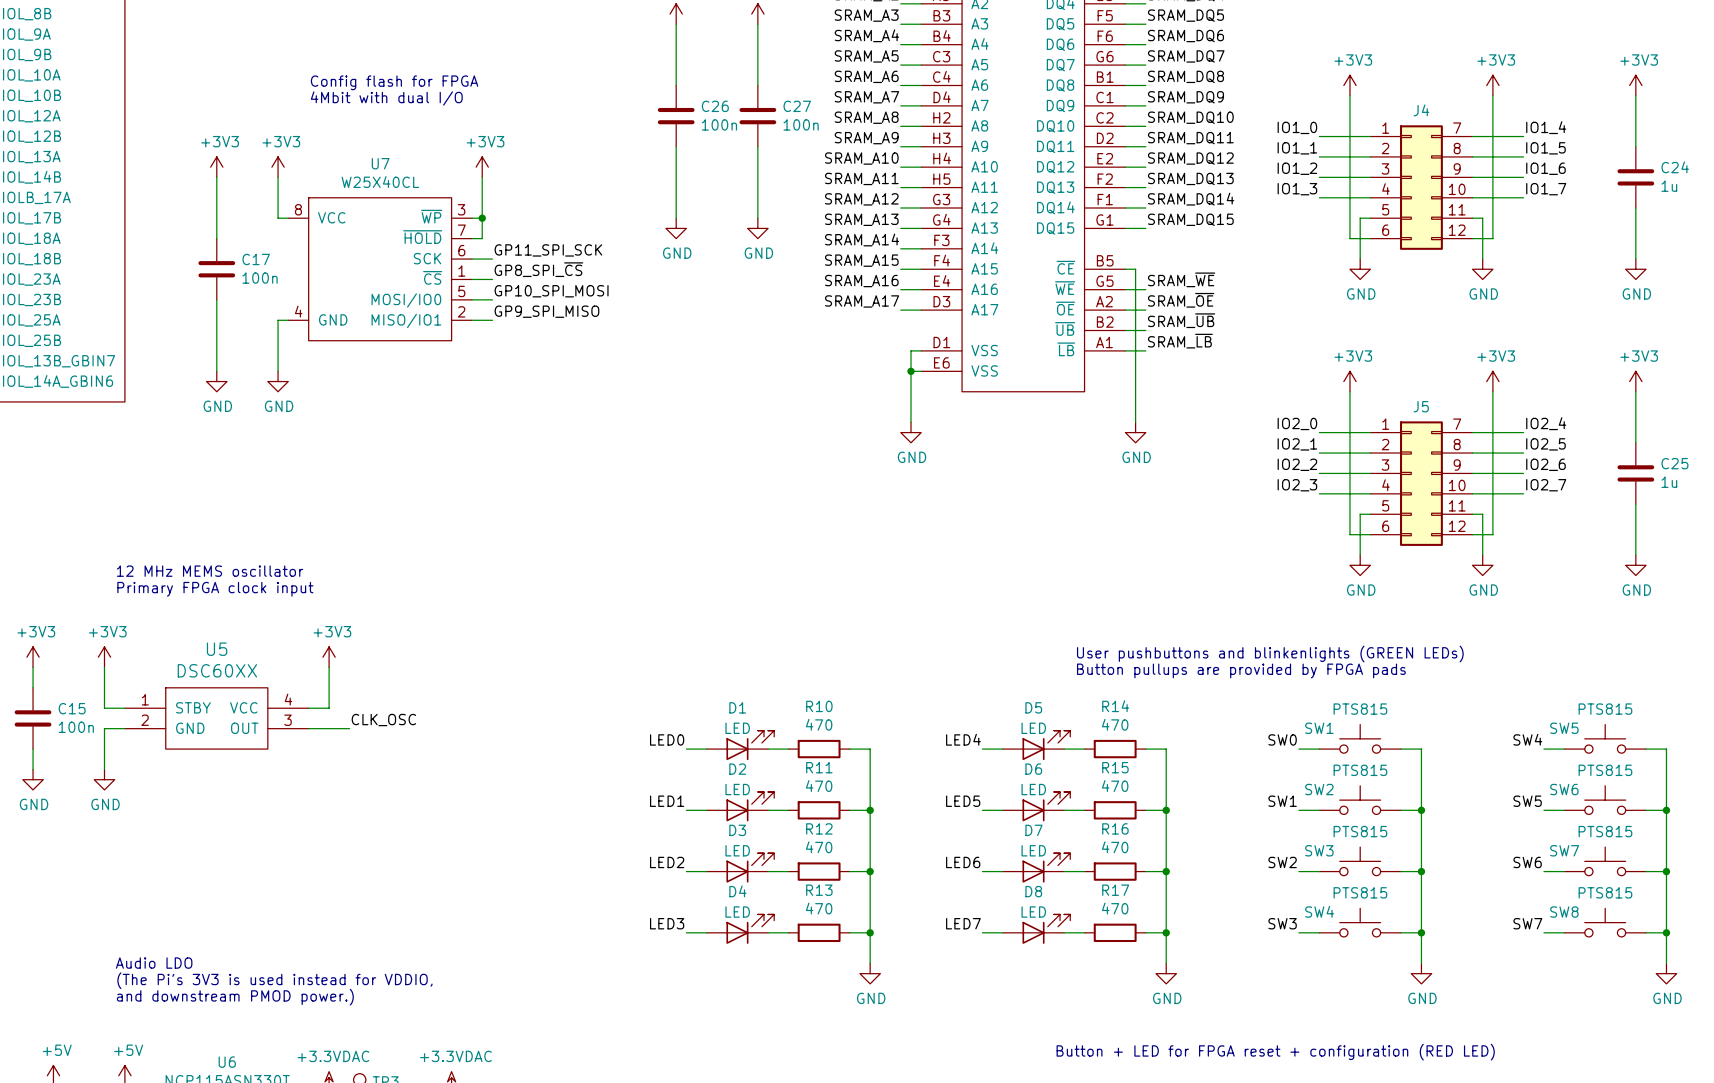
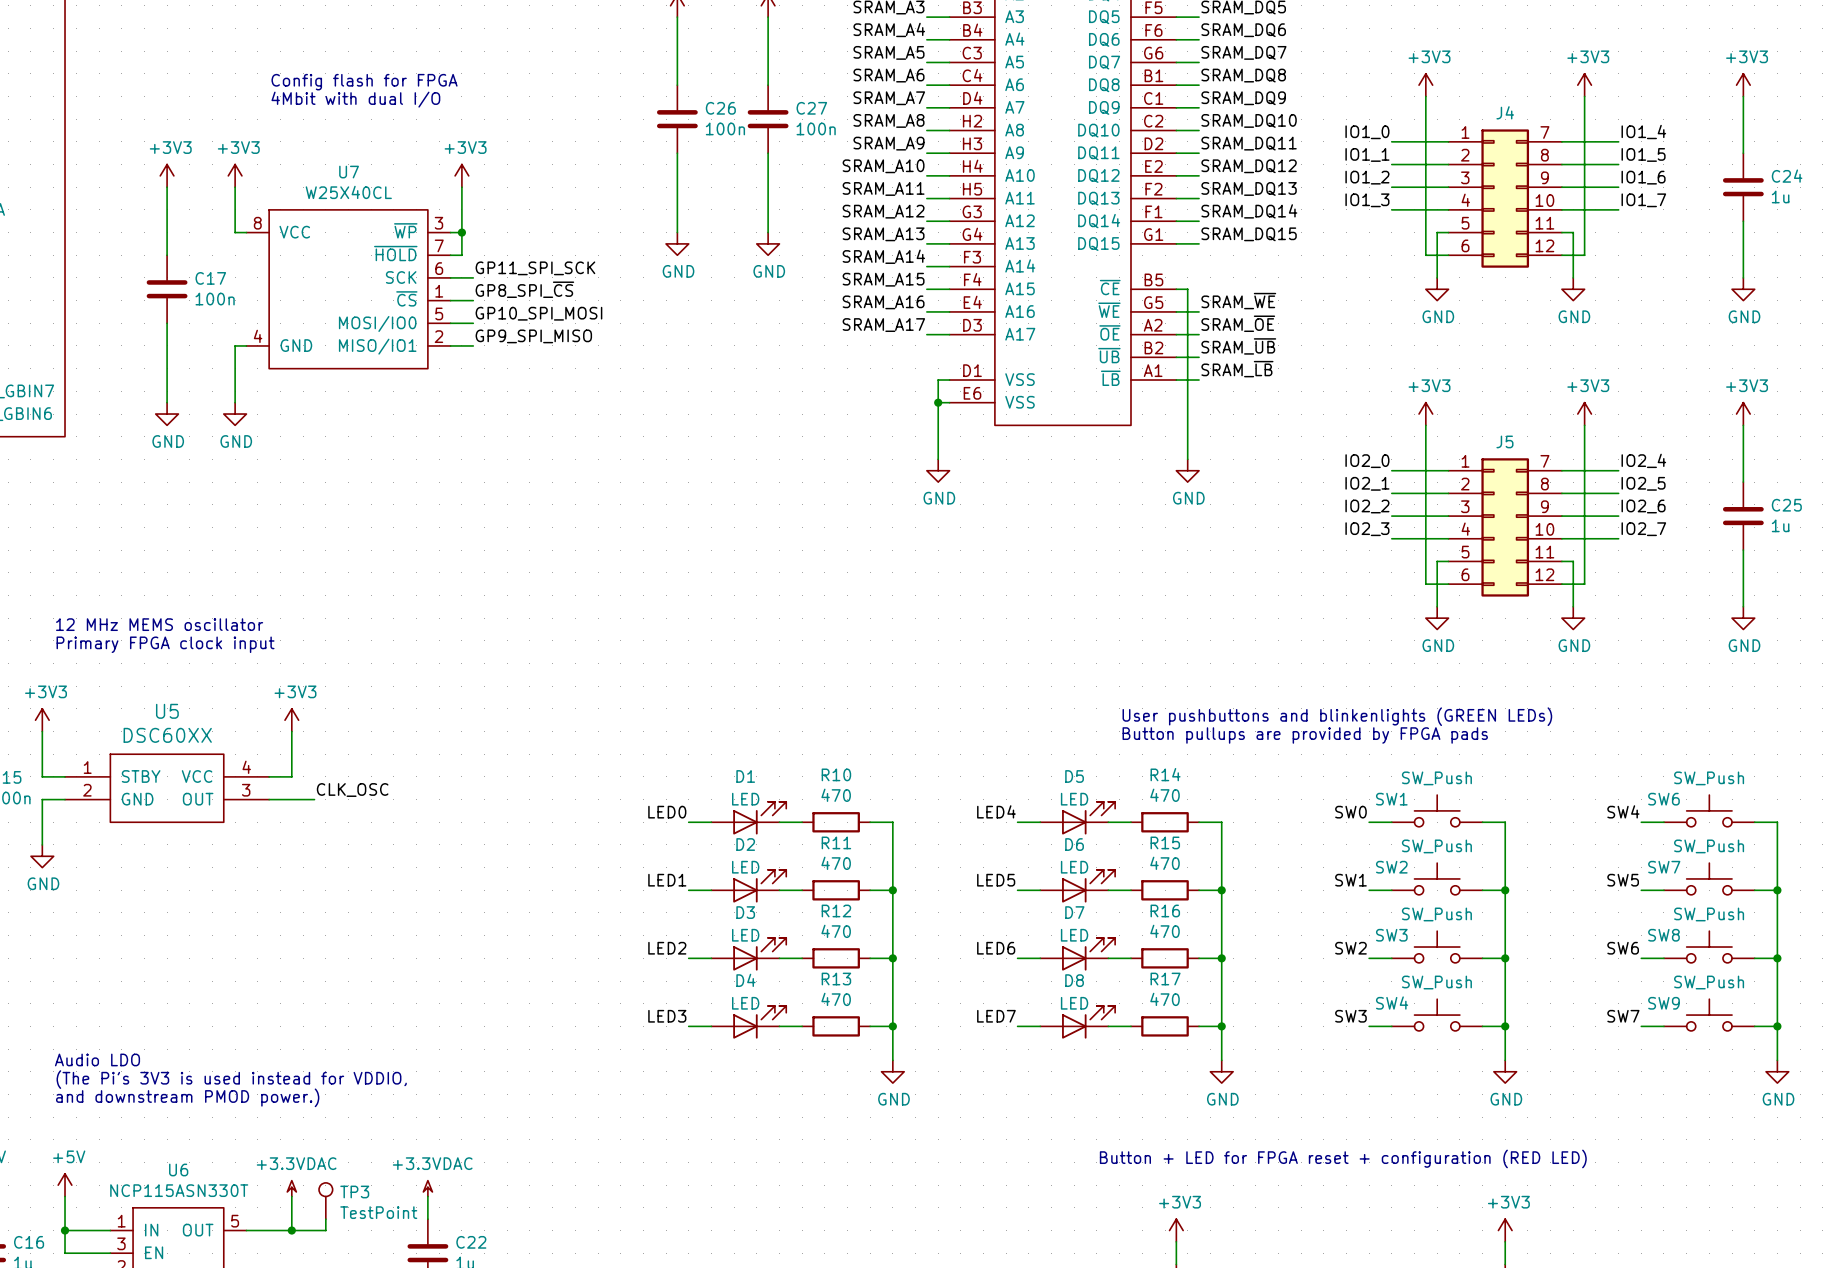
SW1 value: PTS815 (1360, 709) -> SW_Push (1436, 778)
SW5 value: PTS815 (1605, 709) -> SW_Push (1709, 778)
SW5 name: SW5 (1564, 728) -> SW6 (1663, 799)
SW2 value: PTS815 (1360, 770) -> SW_Push (1436, 846)
SW6 value: PTS815 (1605, 770) -> SW_Push (1709, 846)
SW6 name: SW6 (1564, 789) -> SW7 (1664, 867)
SW3 value: PTS815 (1360, 831) -> SW_Push (1436, 914)
SW7 value: PTS815 (1605, 831) -> SW_Push (1709, 914)
SW7 name: SW7 (1564, 850) -> SW8 (1663, 935)
SW4 value: PTS815 (1360, 892) -> SW_Push (1436, 982)
SW8 value: PTS815 (1605, 892) -> SW_Push (1709, 982)
SW8 name: SW8 (1564, 912) -> SW9 (1663, 1003)

